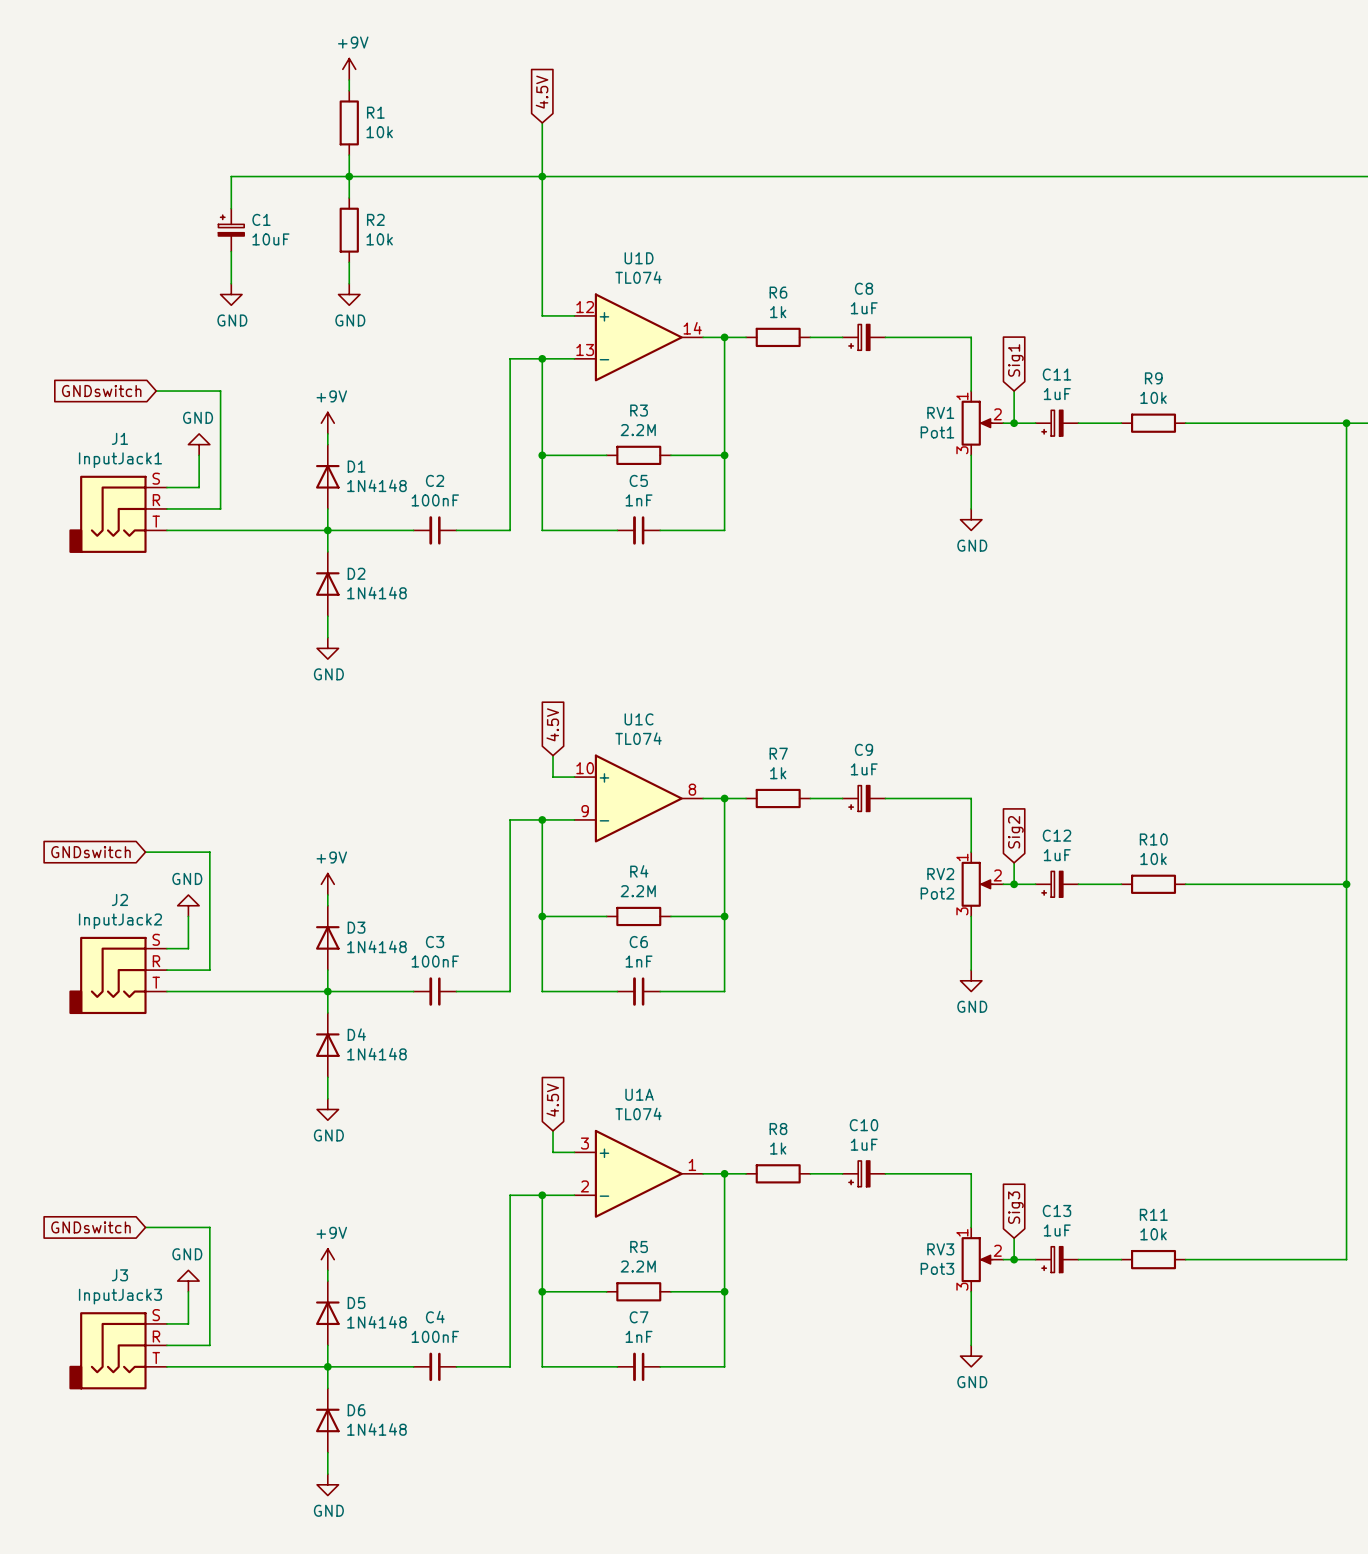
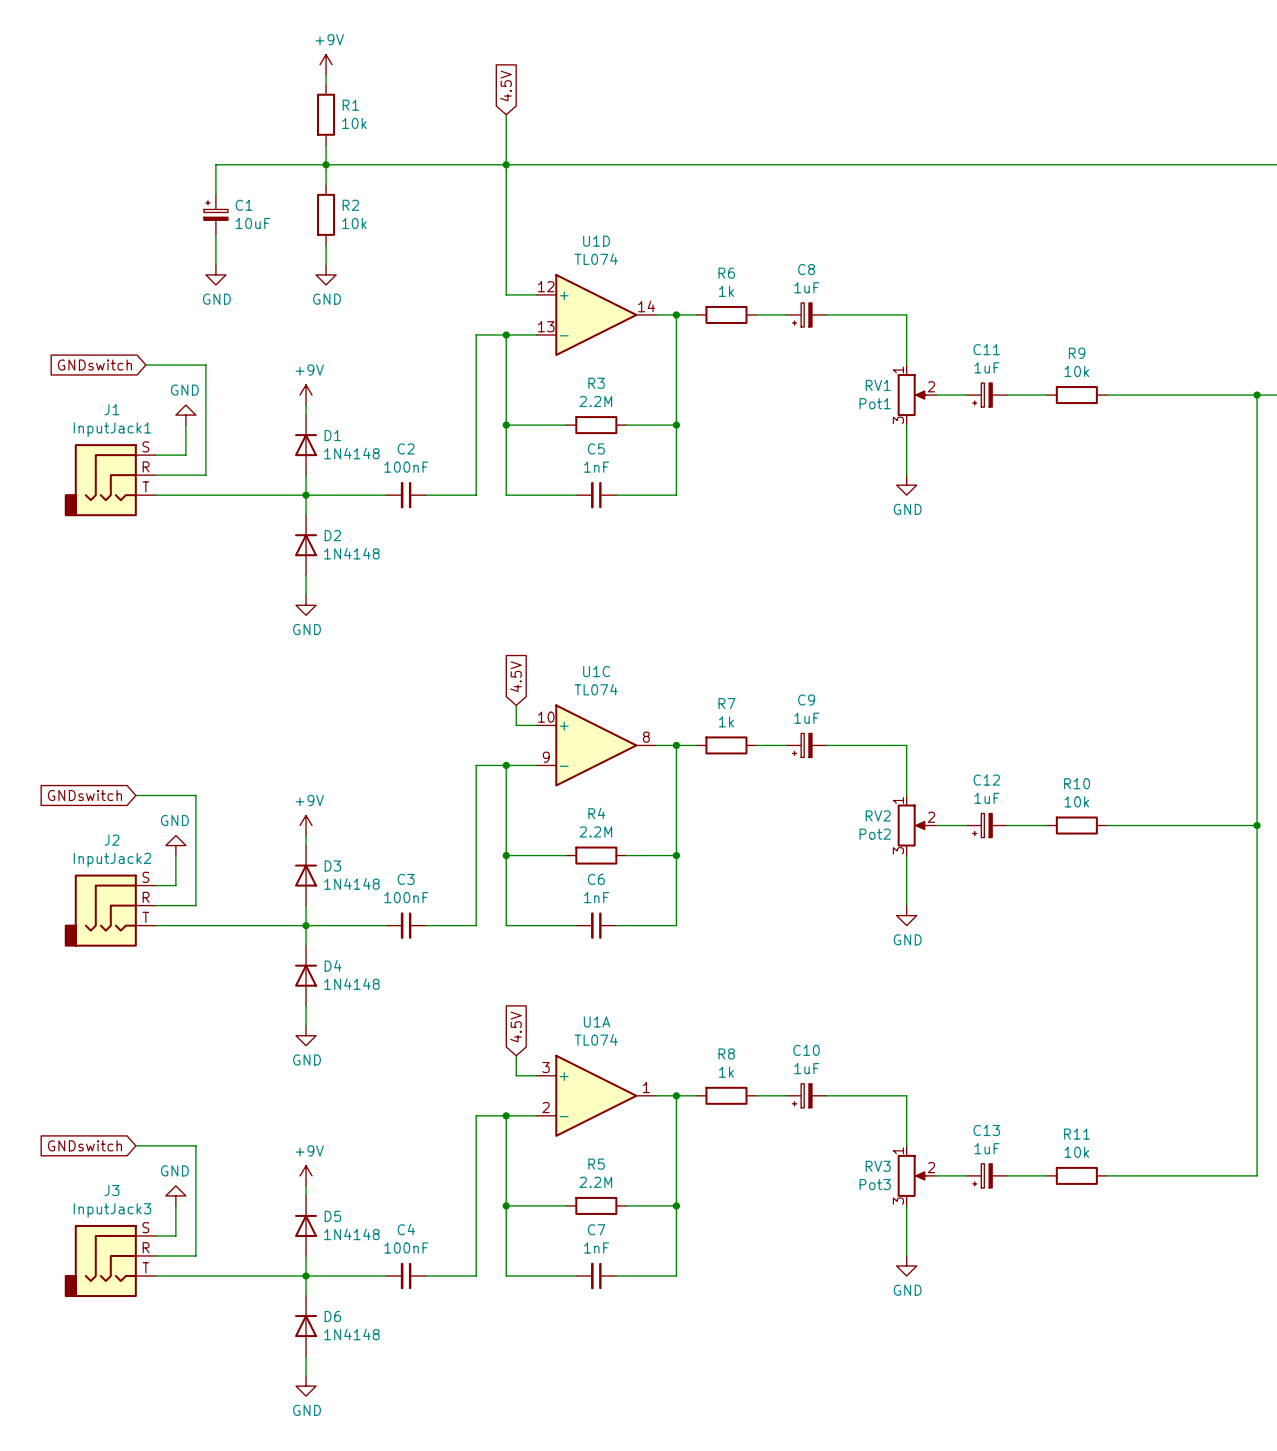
global label: Sig1 (1015, 360) -> none
wire: (1014, 391) (1014, 423) -> none
junction: (1014, 423) -> none
global label: Sig2 (1015, 832) -> none
wire: (1014, 862) (1014, 884) -> none
junction: (1014, 884) -> none
global label: Sig3 (1015, 1207) -> none
wire: (1014, 1238) (1014, 1259) -> none
junction: (1014, 1259) -> none

